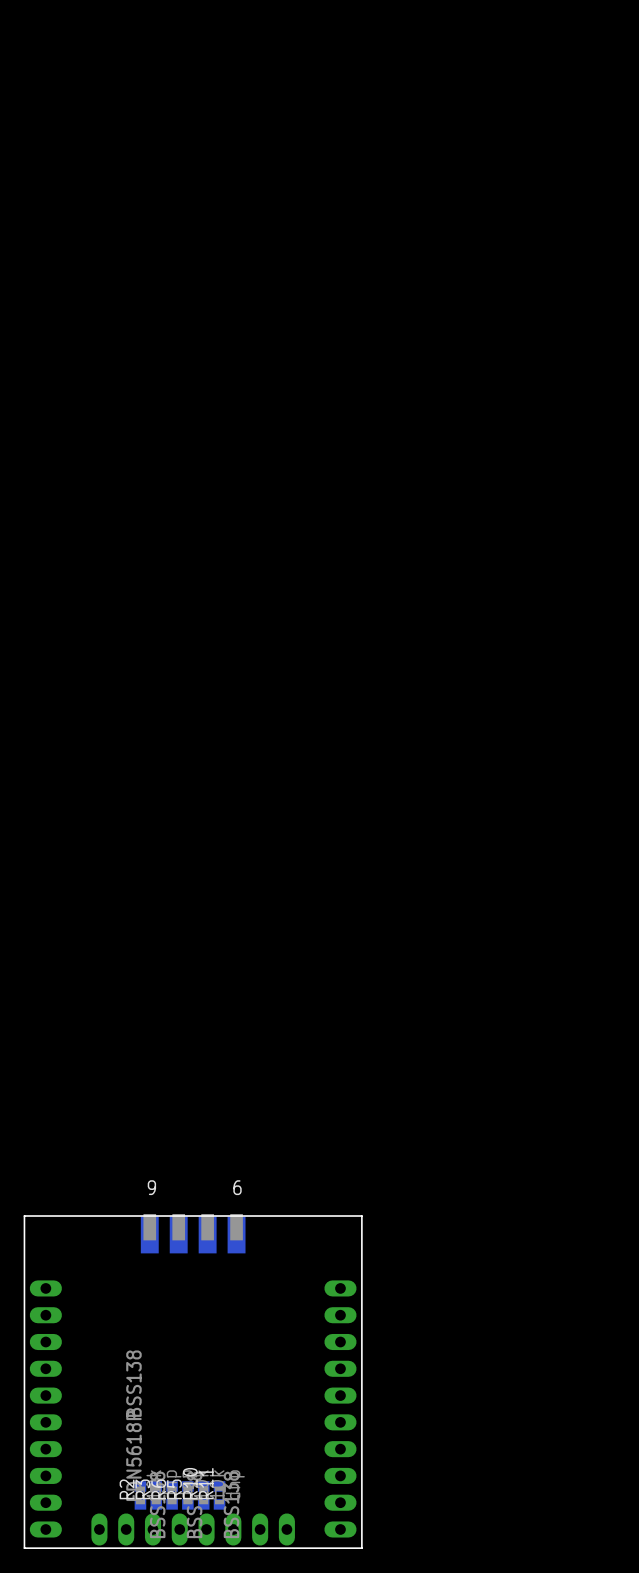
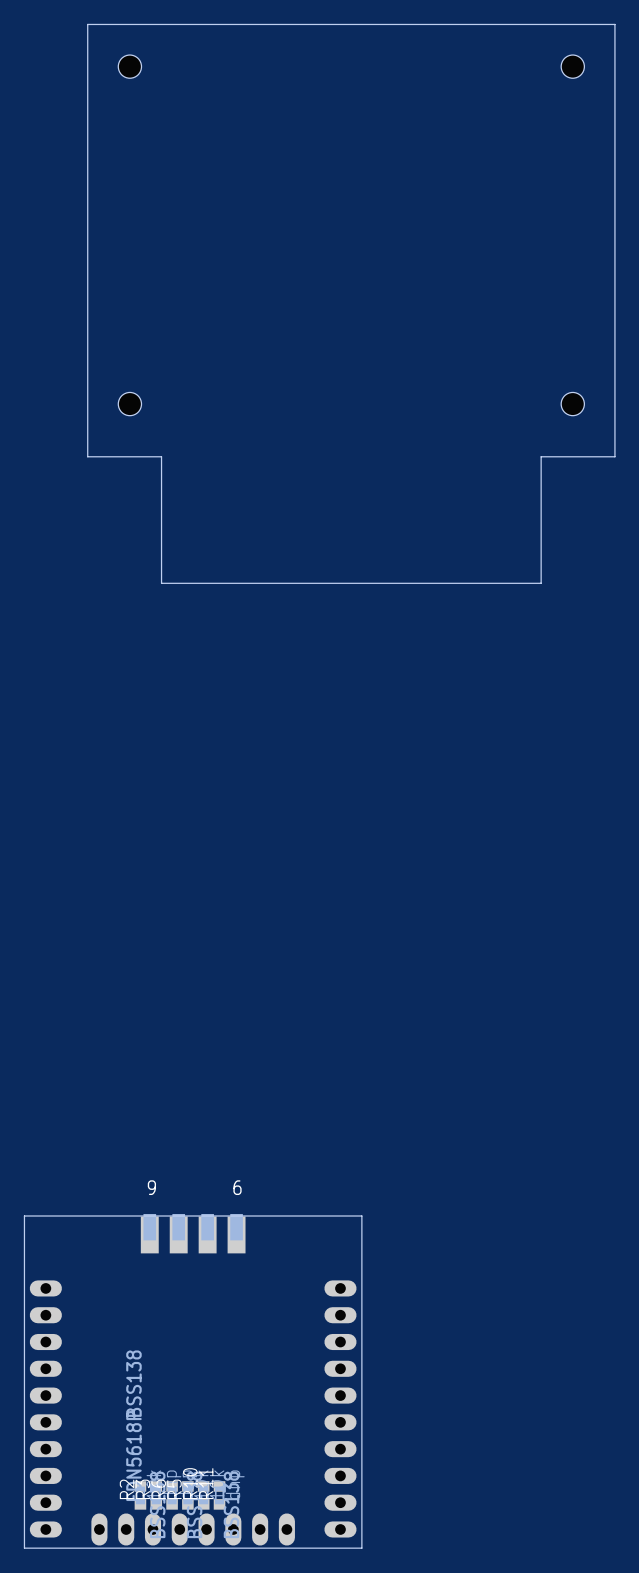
board edge: none -> (614, 24) (614, 456) (541, 456) (541, 583) (161, 583) (161, 456) (87, 456) (87, 24) (614, 24)
hole: none -> (129, 66)
hole: none -> (572, 66)
hole: none -> (129, 404)
hole: none -> (572, 404)

